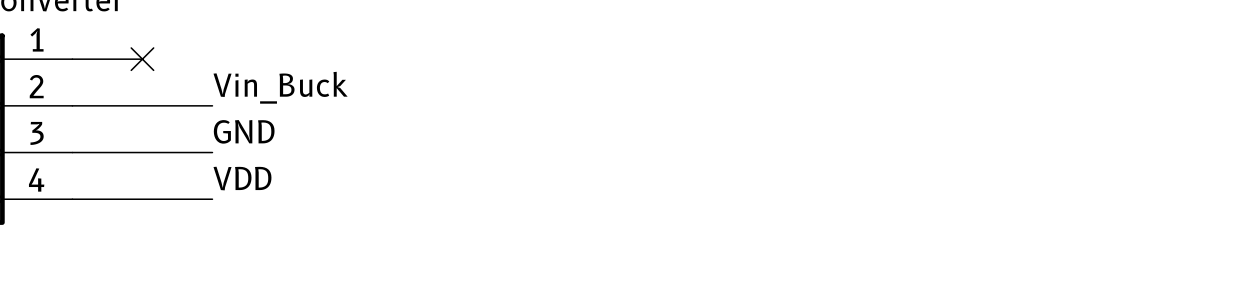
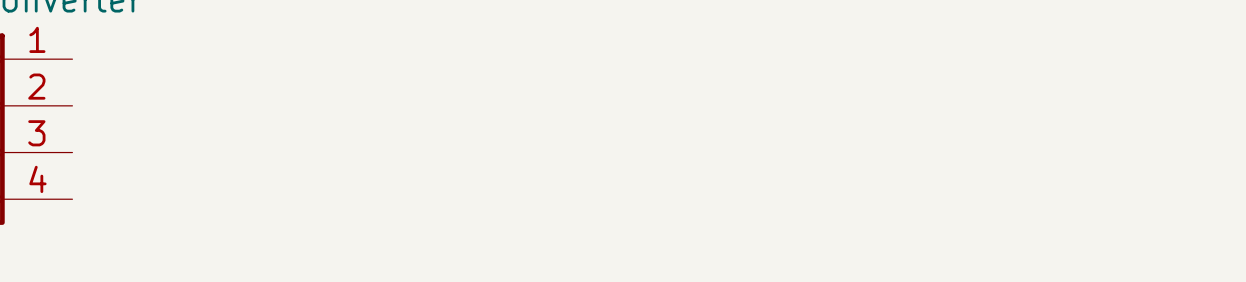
wire: (72, 59) (142, 59) -> none
no-connect mark: (142, 59) -> none
label: Vin_Buck (280, 87) -> none
wire: (72, 105) (212, 105) -> none
label: GND (244, 131) -> none
wire: (72, 152) (212, 152) -> none
label: VDD (242, 178) -> none
wire: (72, 199) (212, 199) -> none

